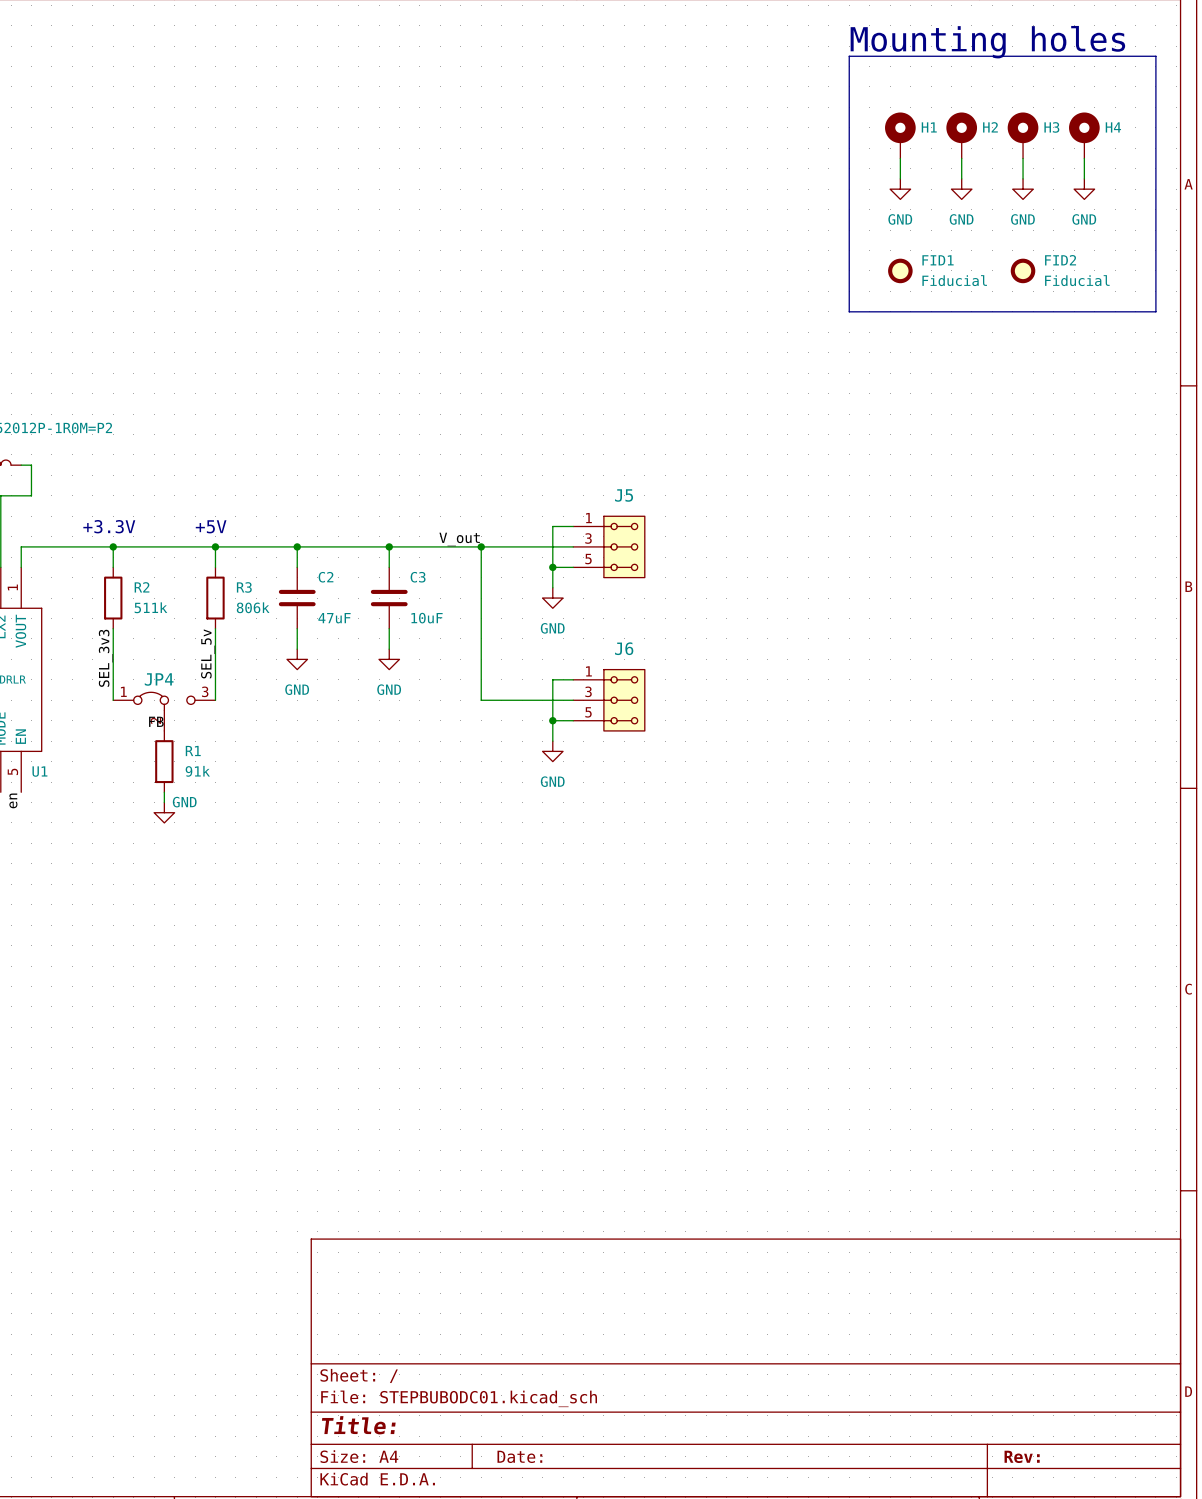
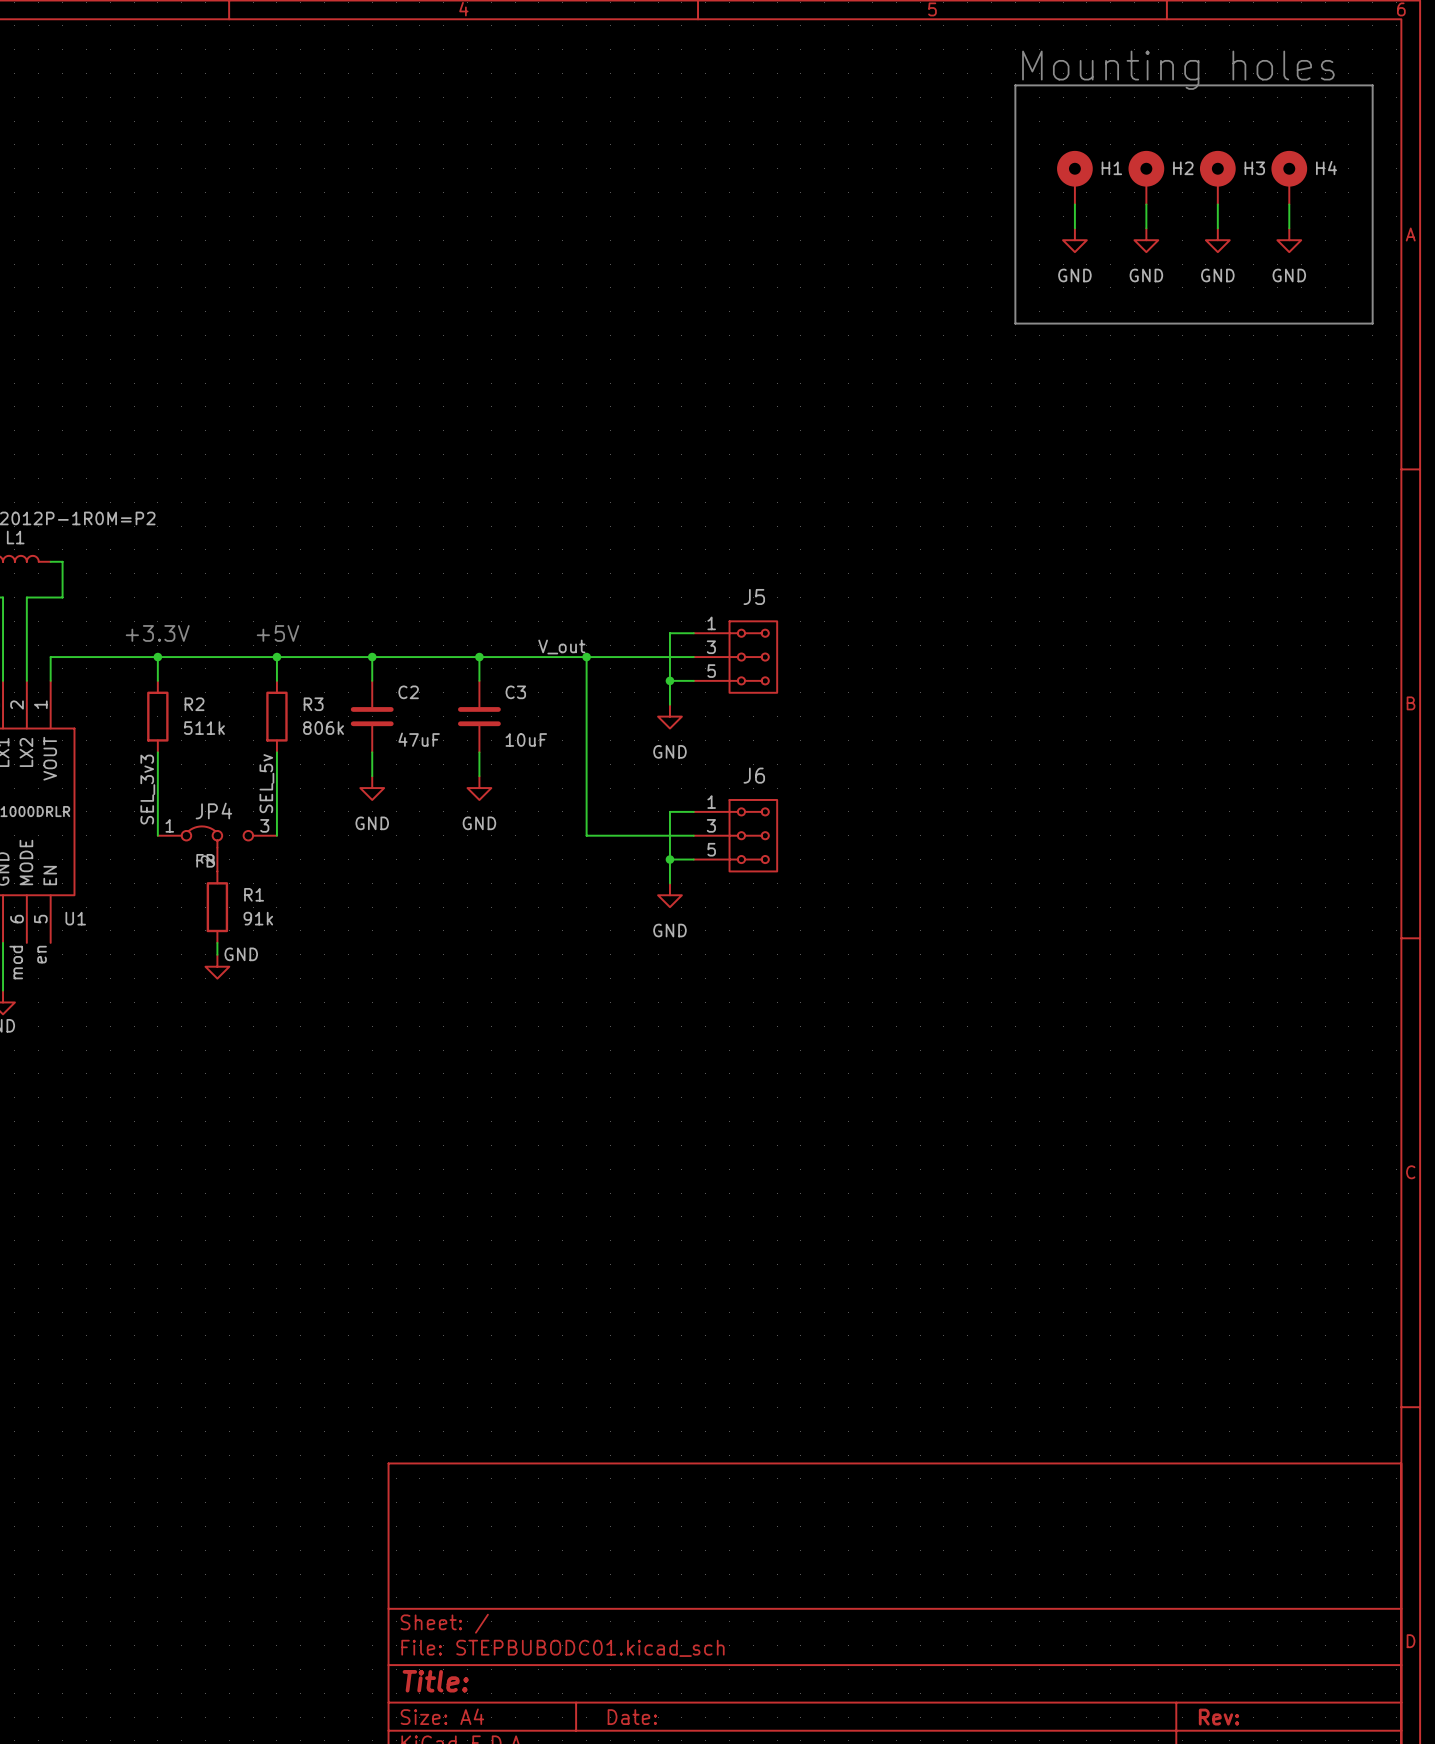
line: (849, 260) (849, 311) (1155, 311) (1155, 260) -> (1015, 323) (1372, 323)
FID1: Fiducial (900, 270) -> none
FID2: Fiducial (1023, 270) -> none

